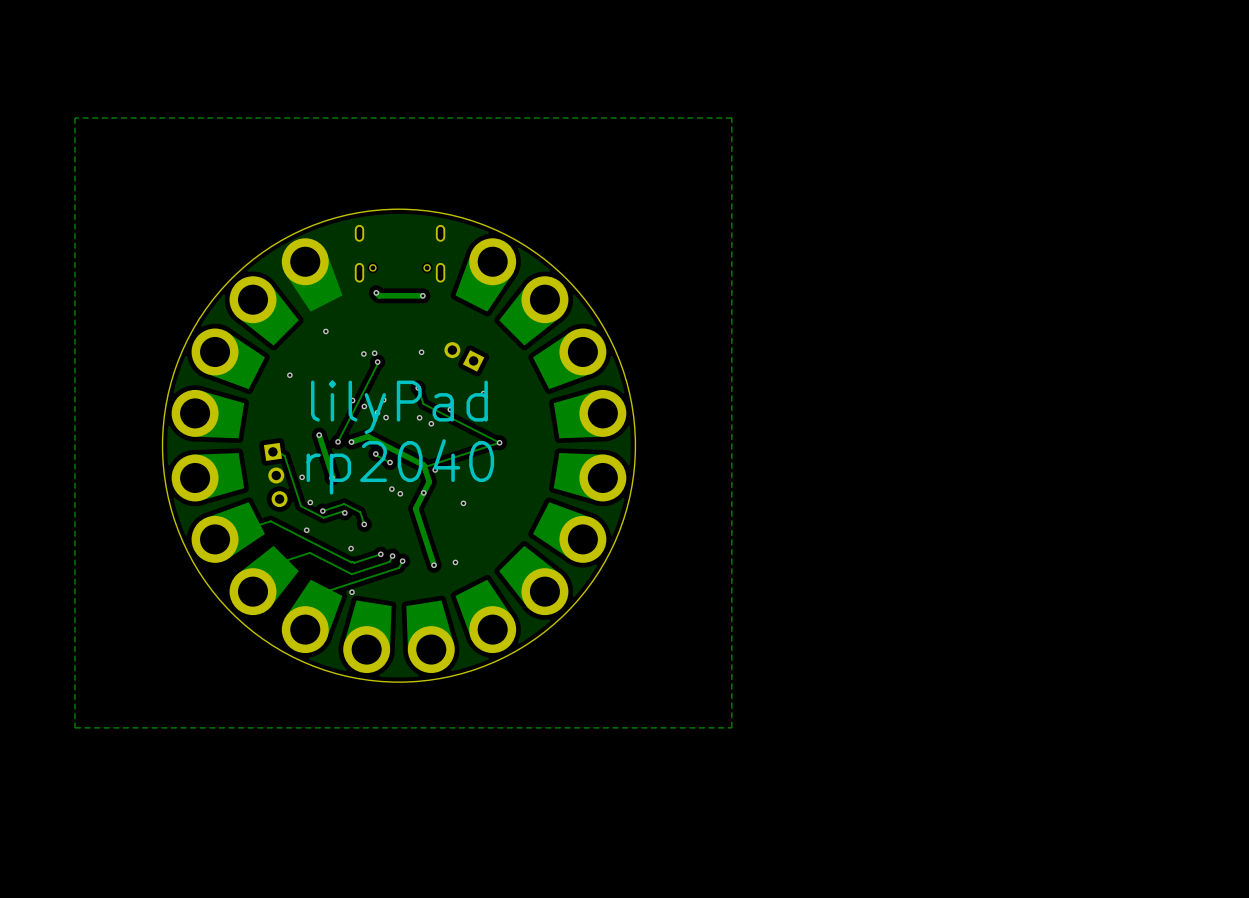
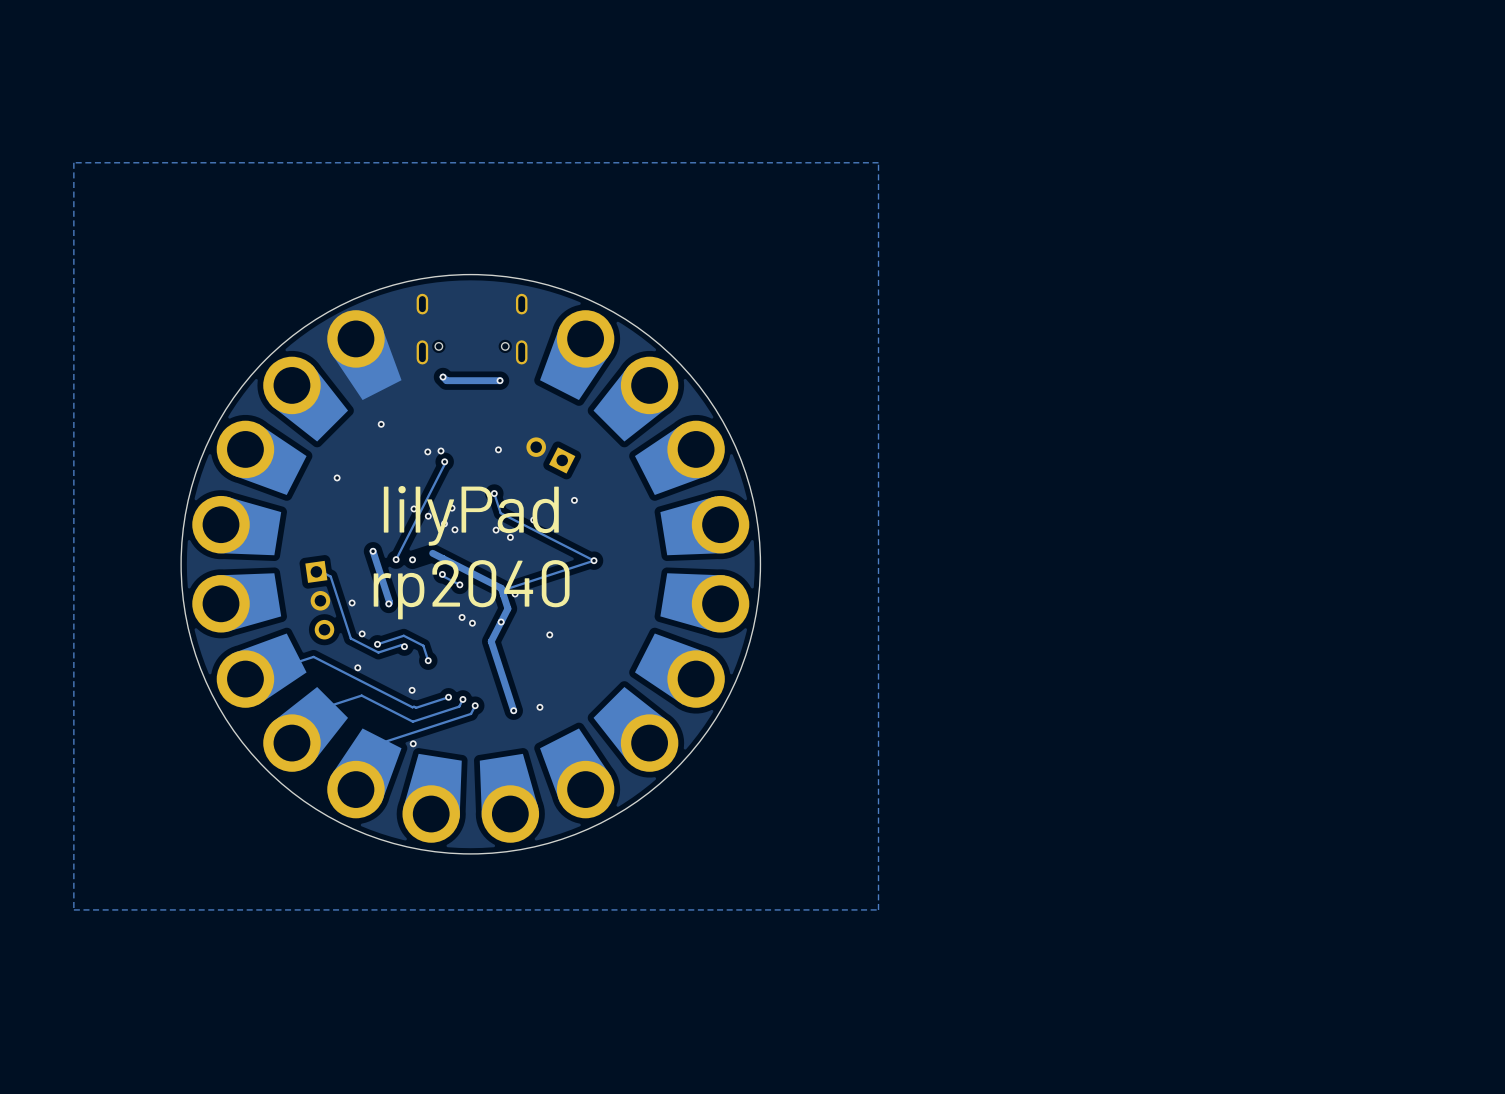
track: (367, 436) (351, 442) -> none

